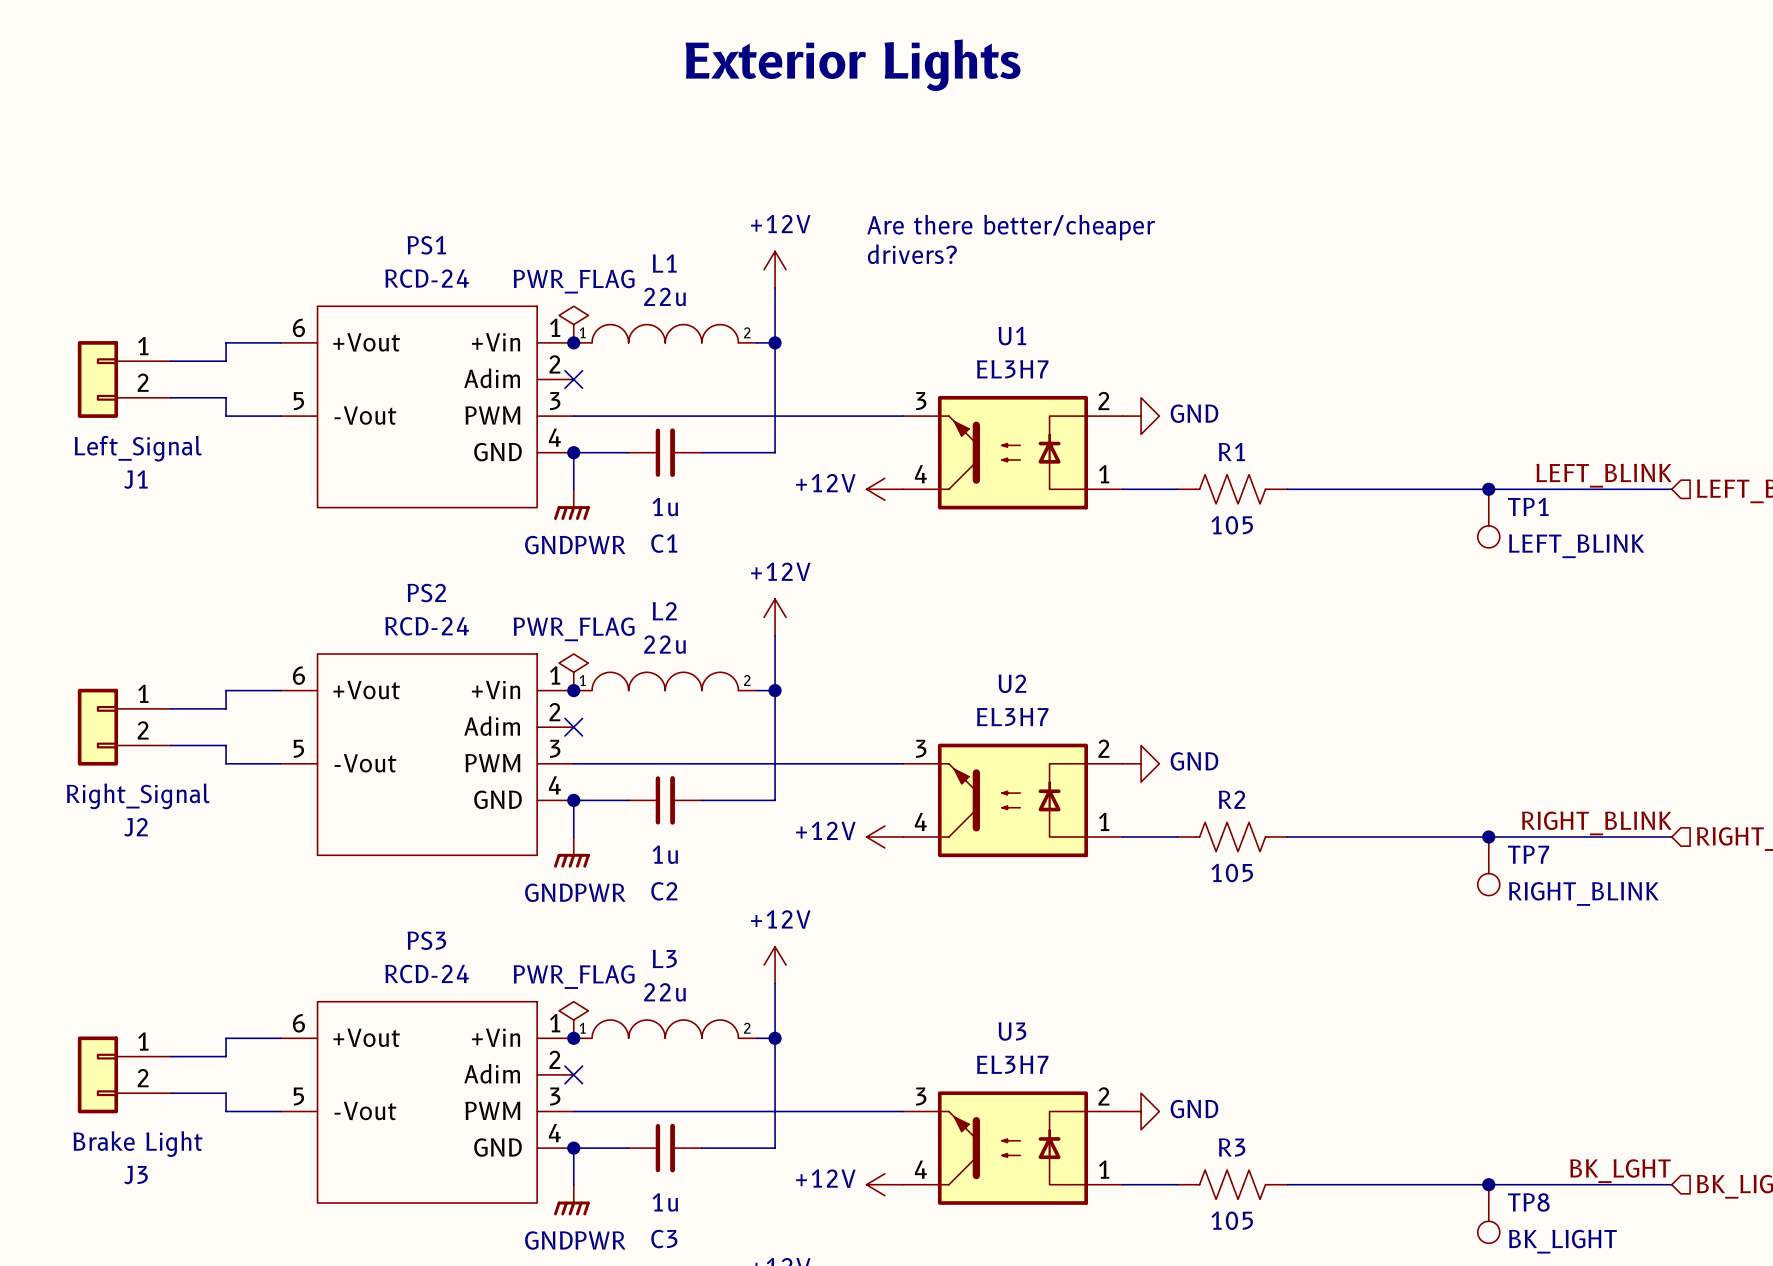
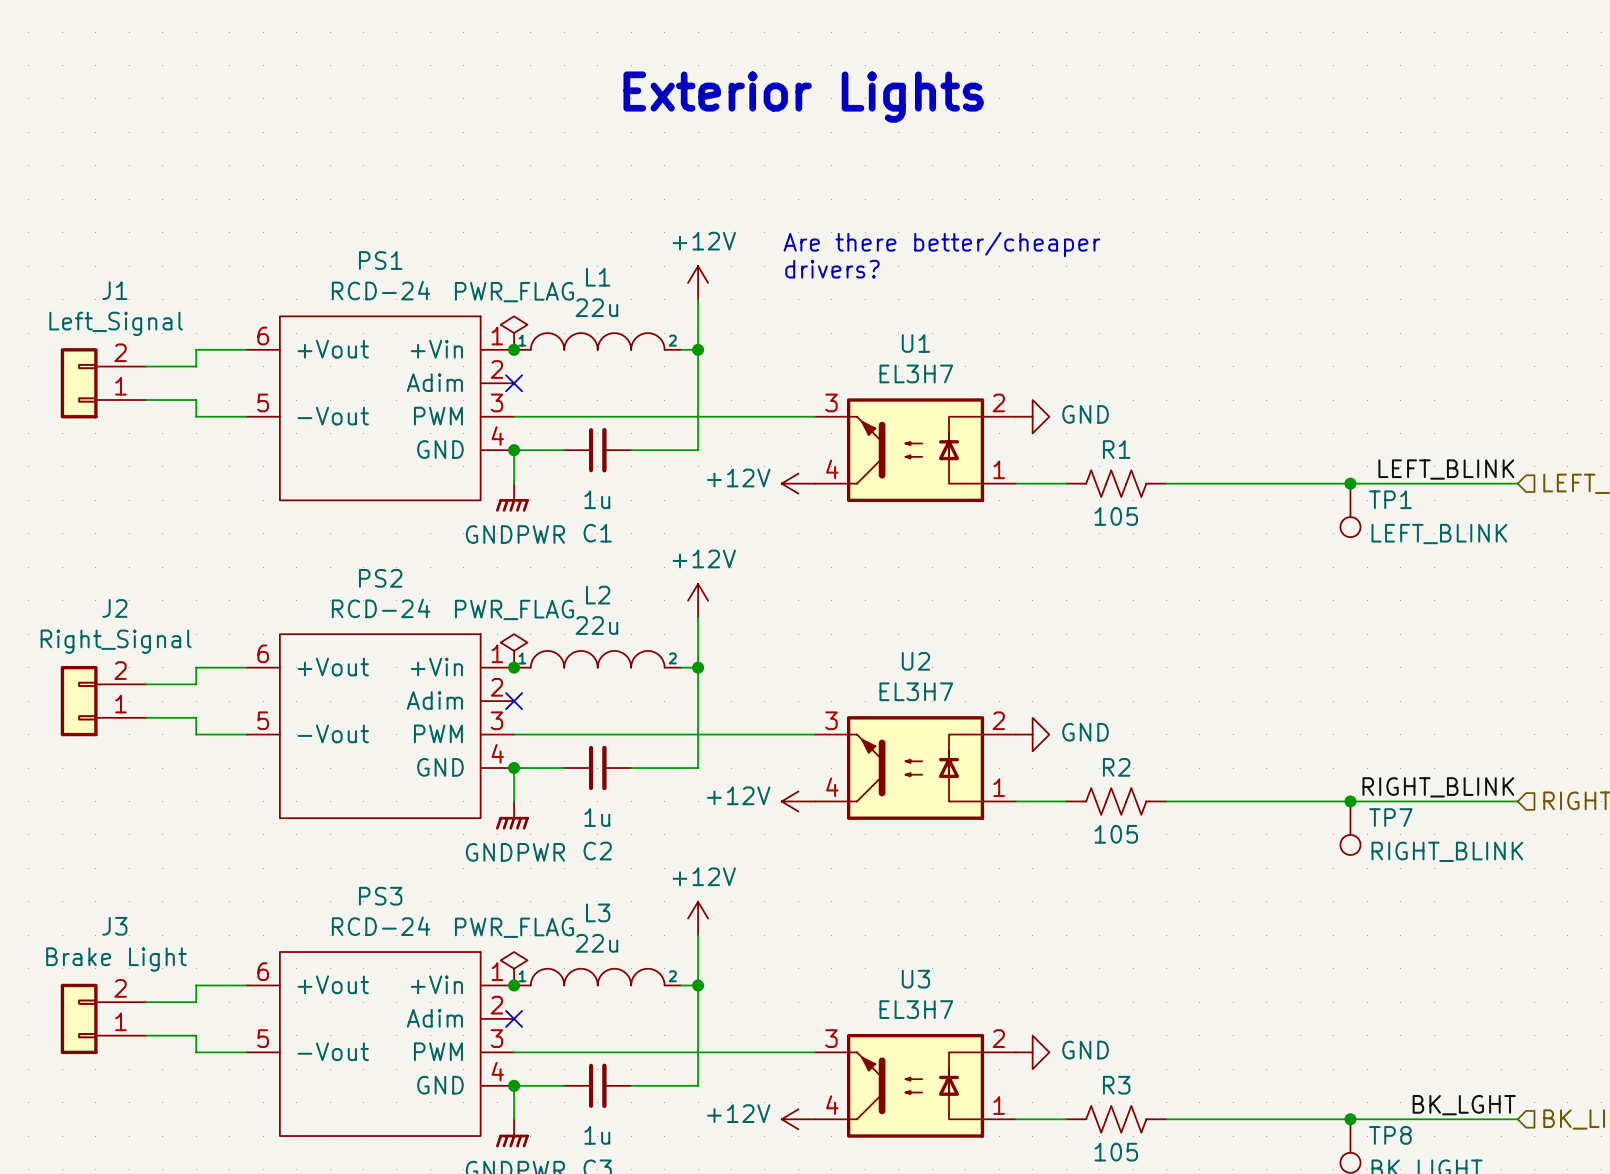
J1 flip: as is (97, 379) -> up-down (79, 383)
J2 flip: as is (97, 727) -> up-down (79, 701)
J3 flip: as is (97, 1074) -> up-down (79, 1018)

